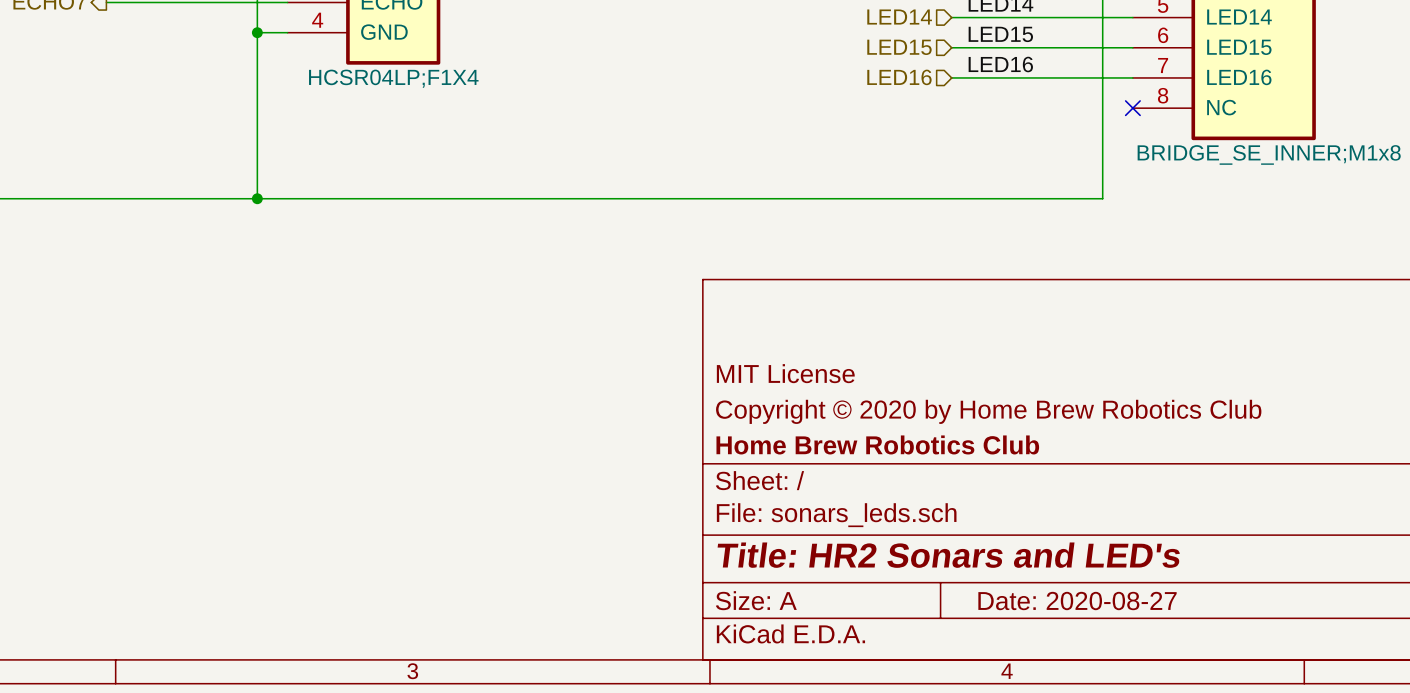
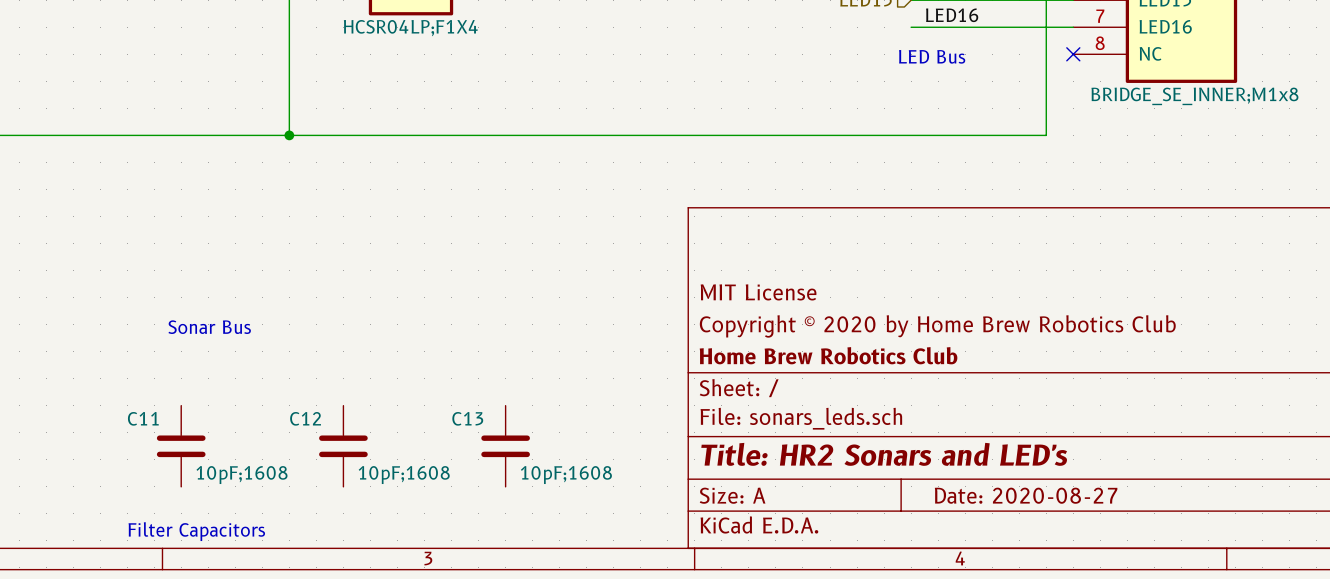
hierarchical label: LED16 (899, 77) -> none
text: none -> LED Bus (932, 56)
text: none -> Sonar Bus (209, 327)
C11: none -> 10pF;1608 (181, 446)
C12: none -> 10pF;1608 (343, 446)
C13: none -> 10pF;1608 (505, 446)
text: none -> Filter Capacitors (196, 531)

